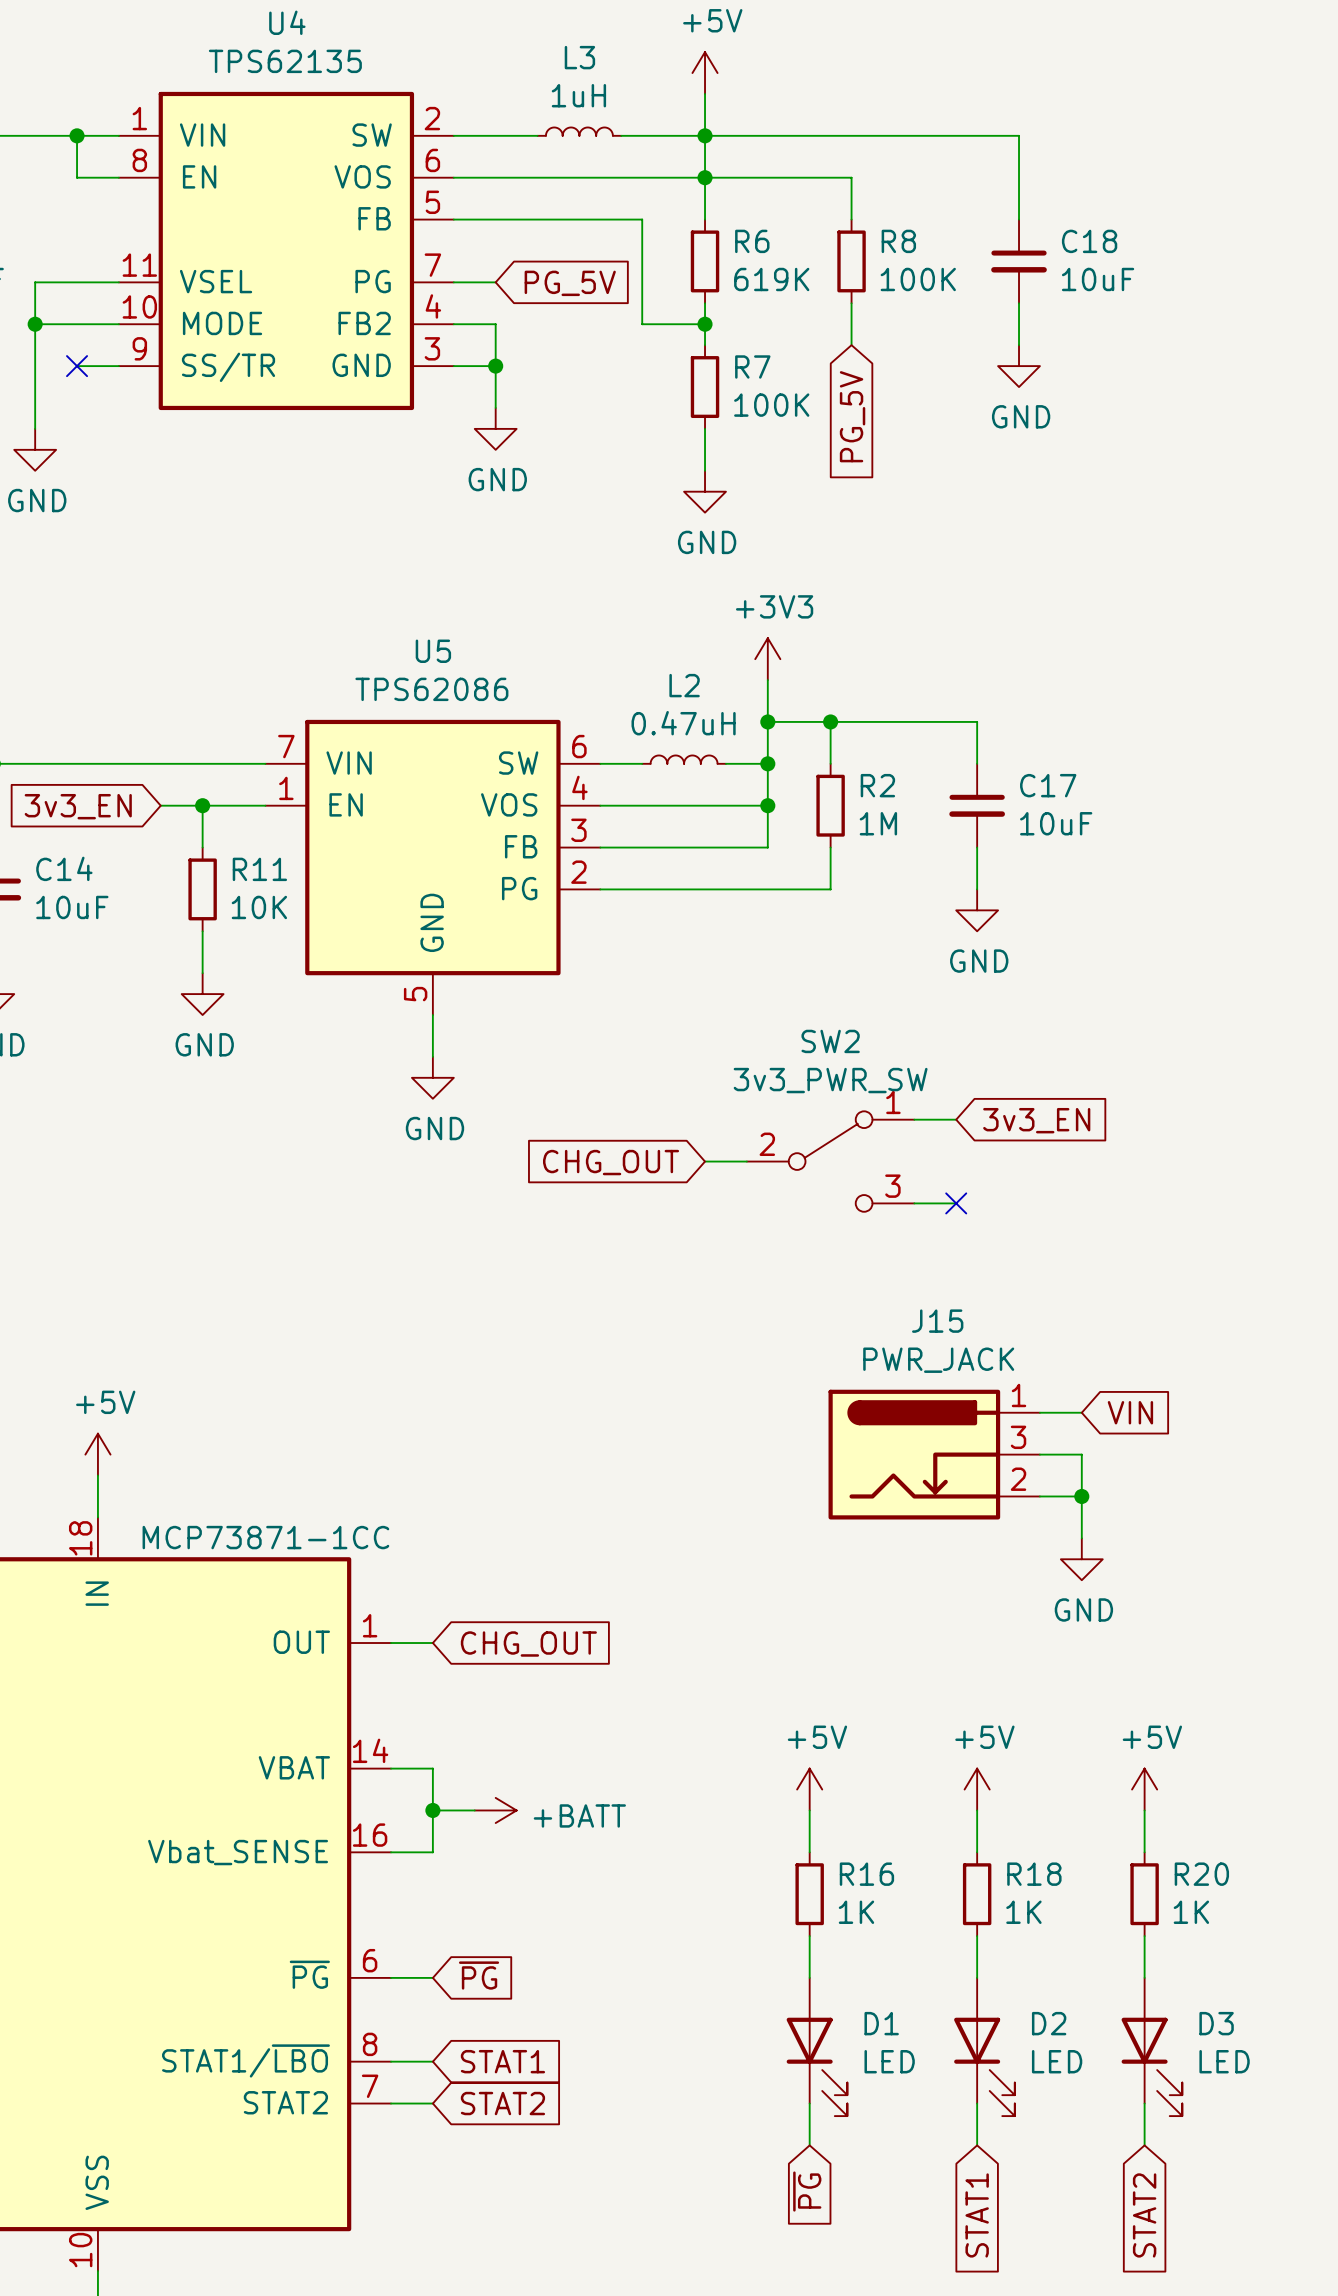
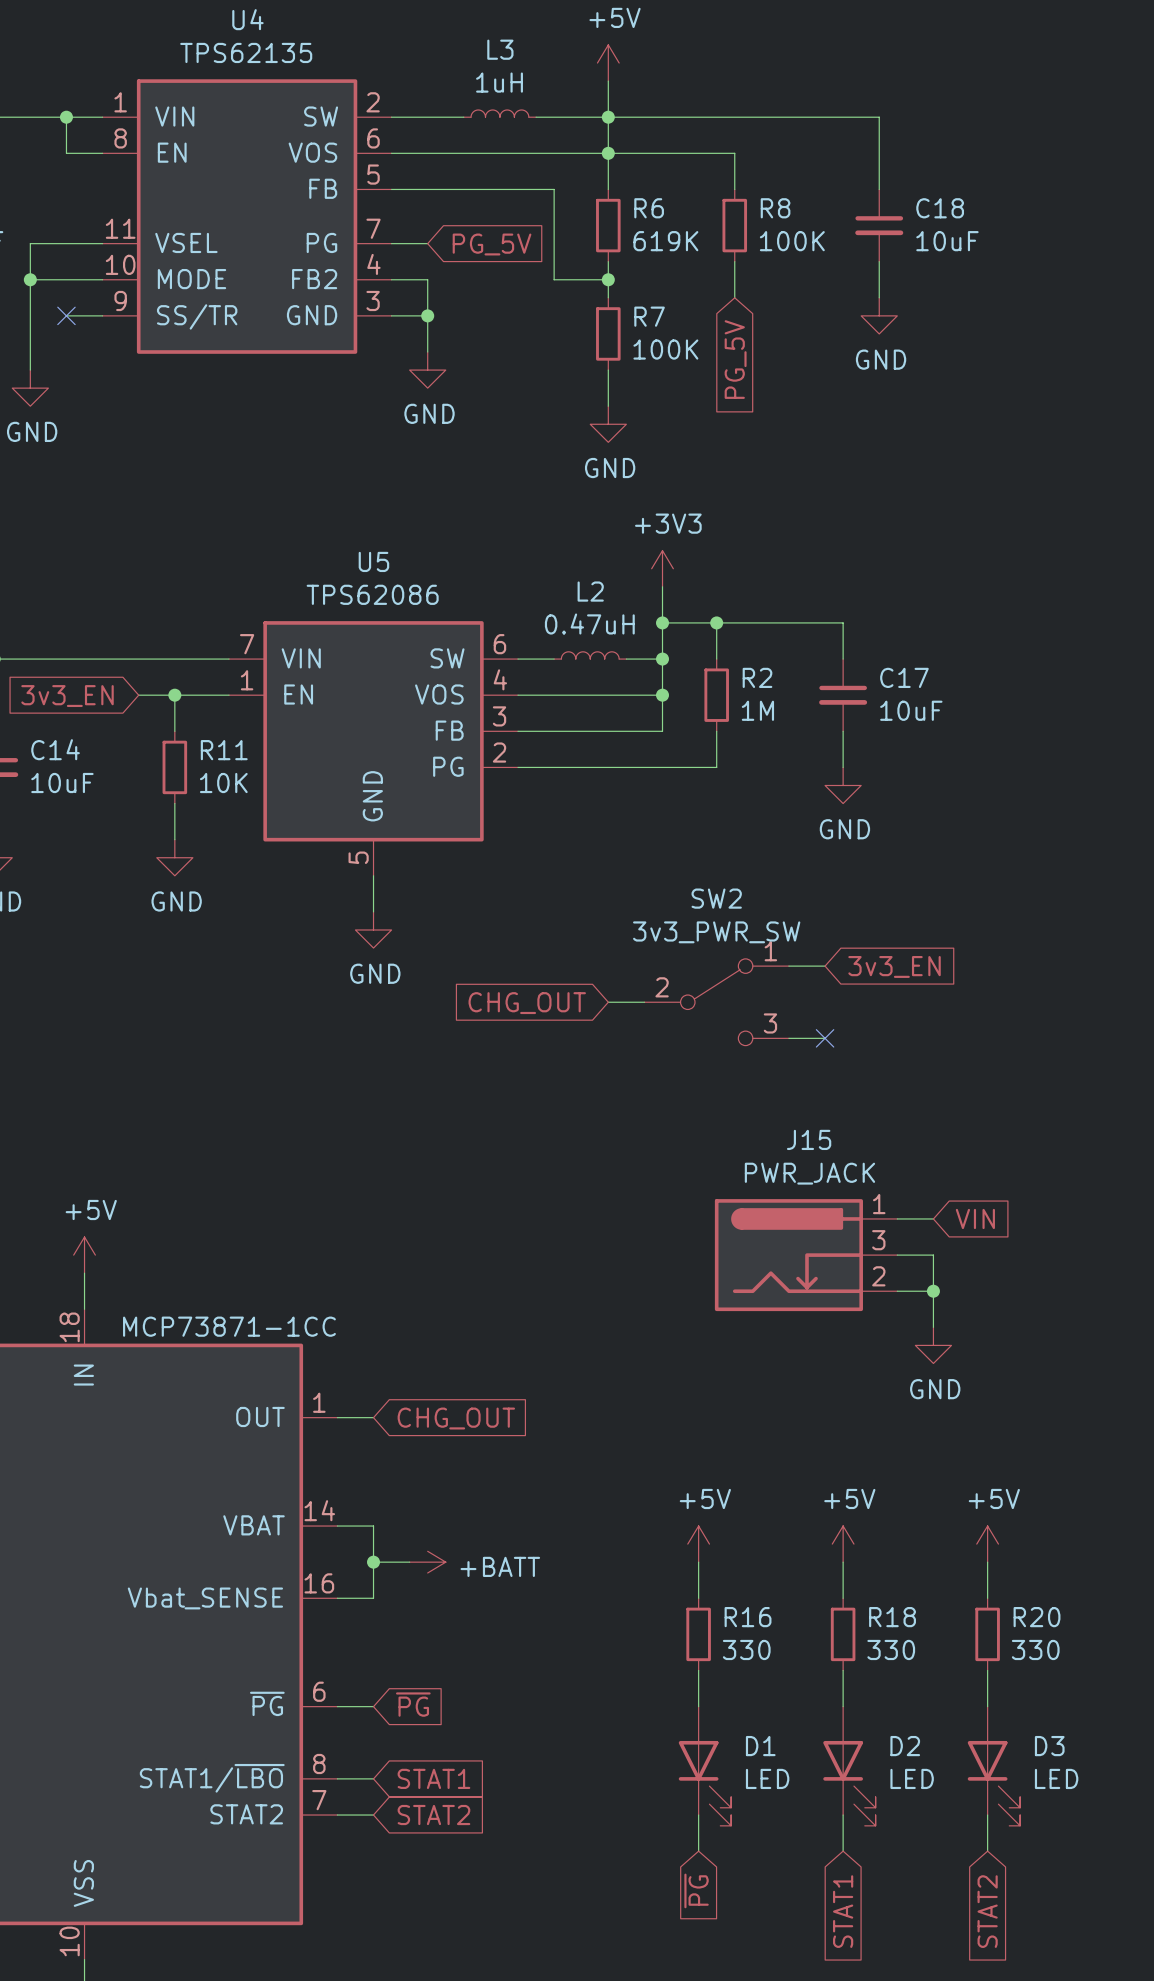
R16 value: 1K (856, 1912) -> 330 (746, 1649)
R18 value: 1K (1023, 1912) -> 330 (891, 1649)
R20 value: 1K (1191, 1912) -> 330 (1035, 1649)

